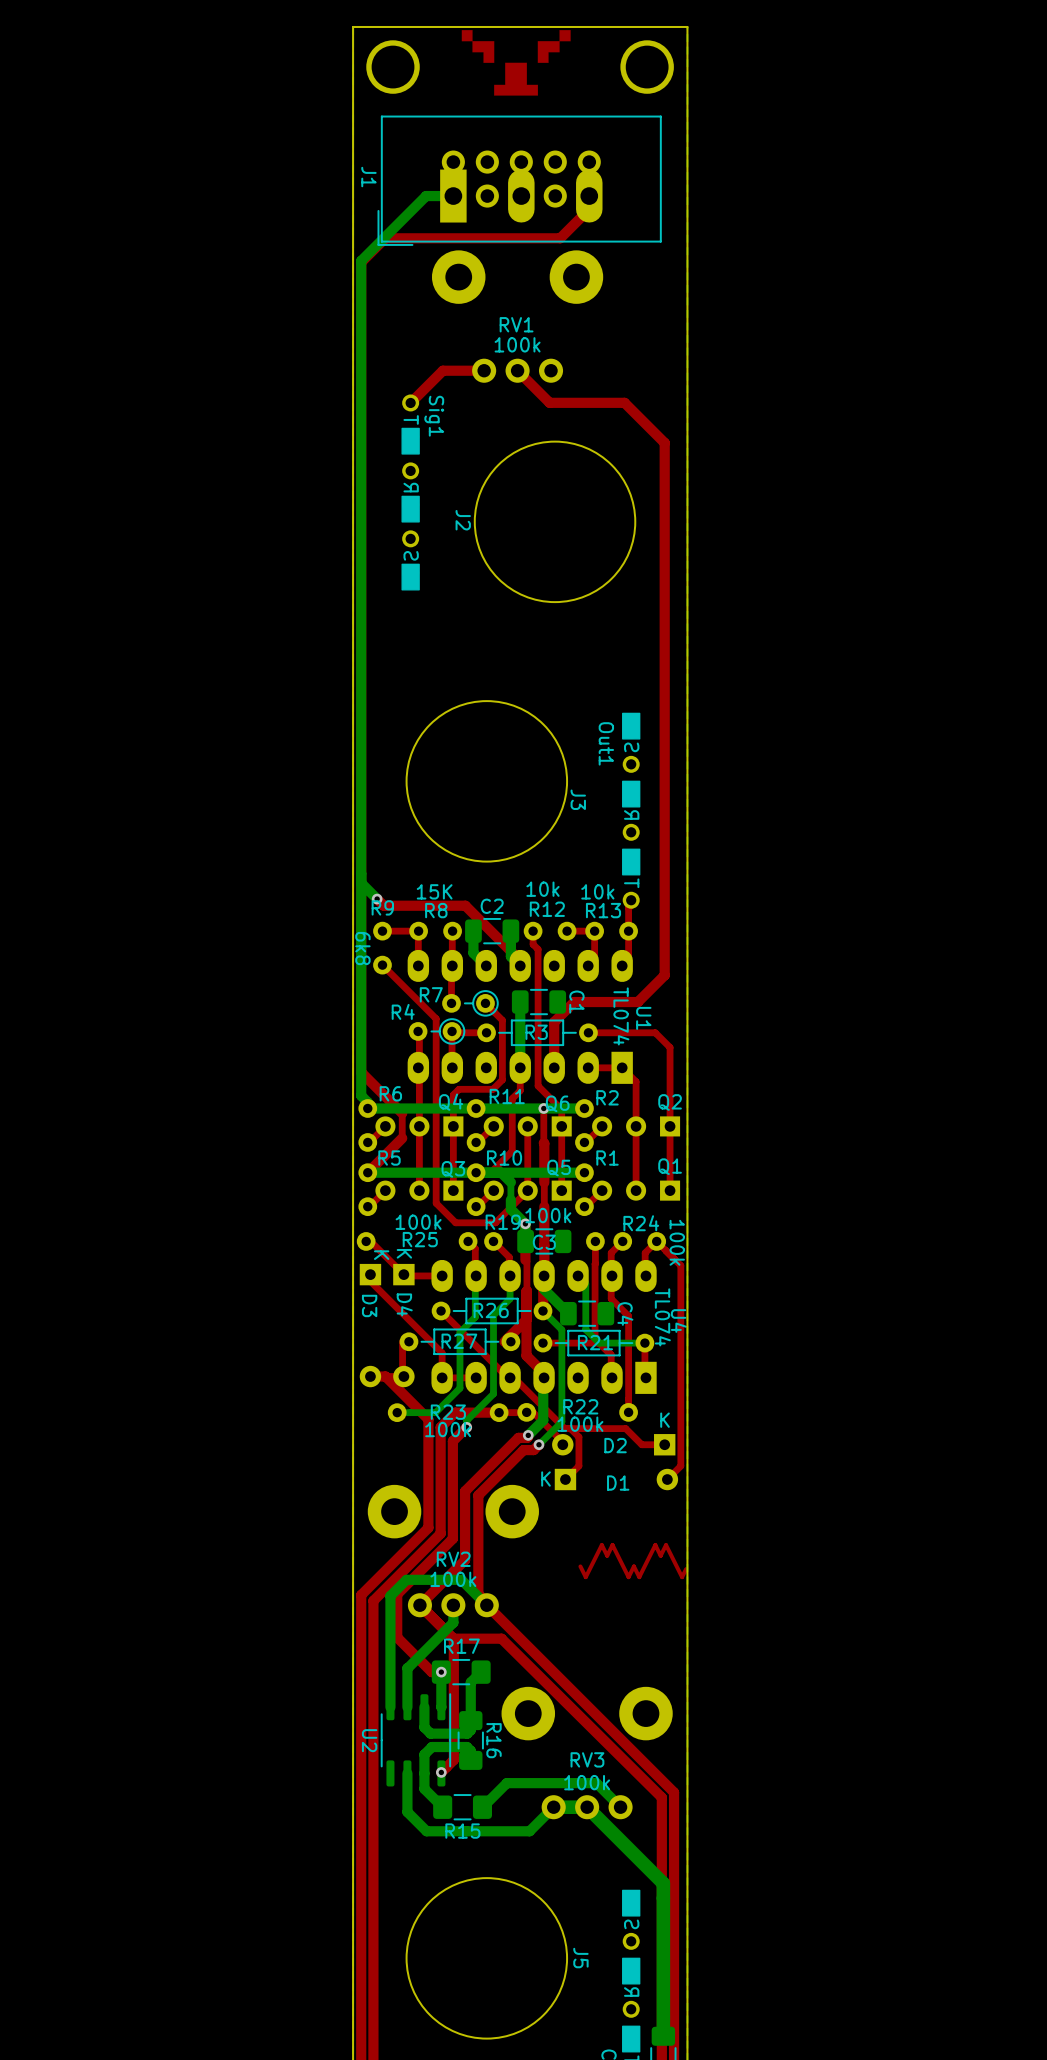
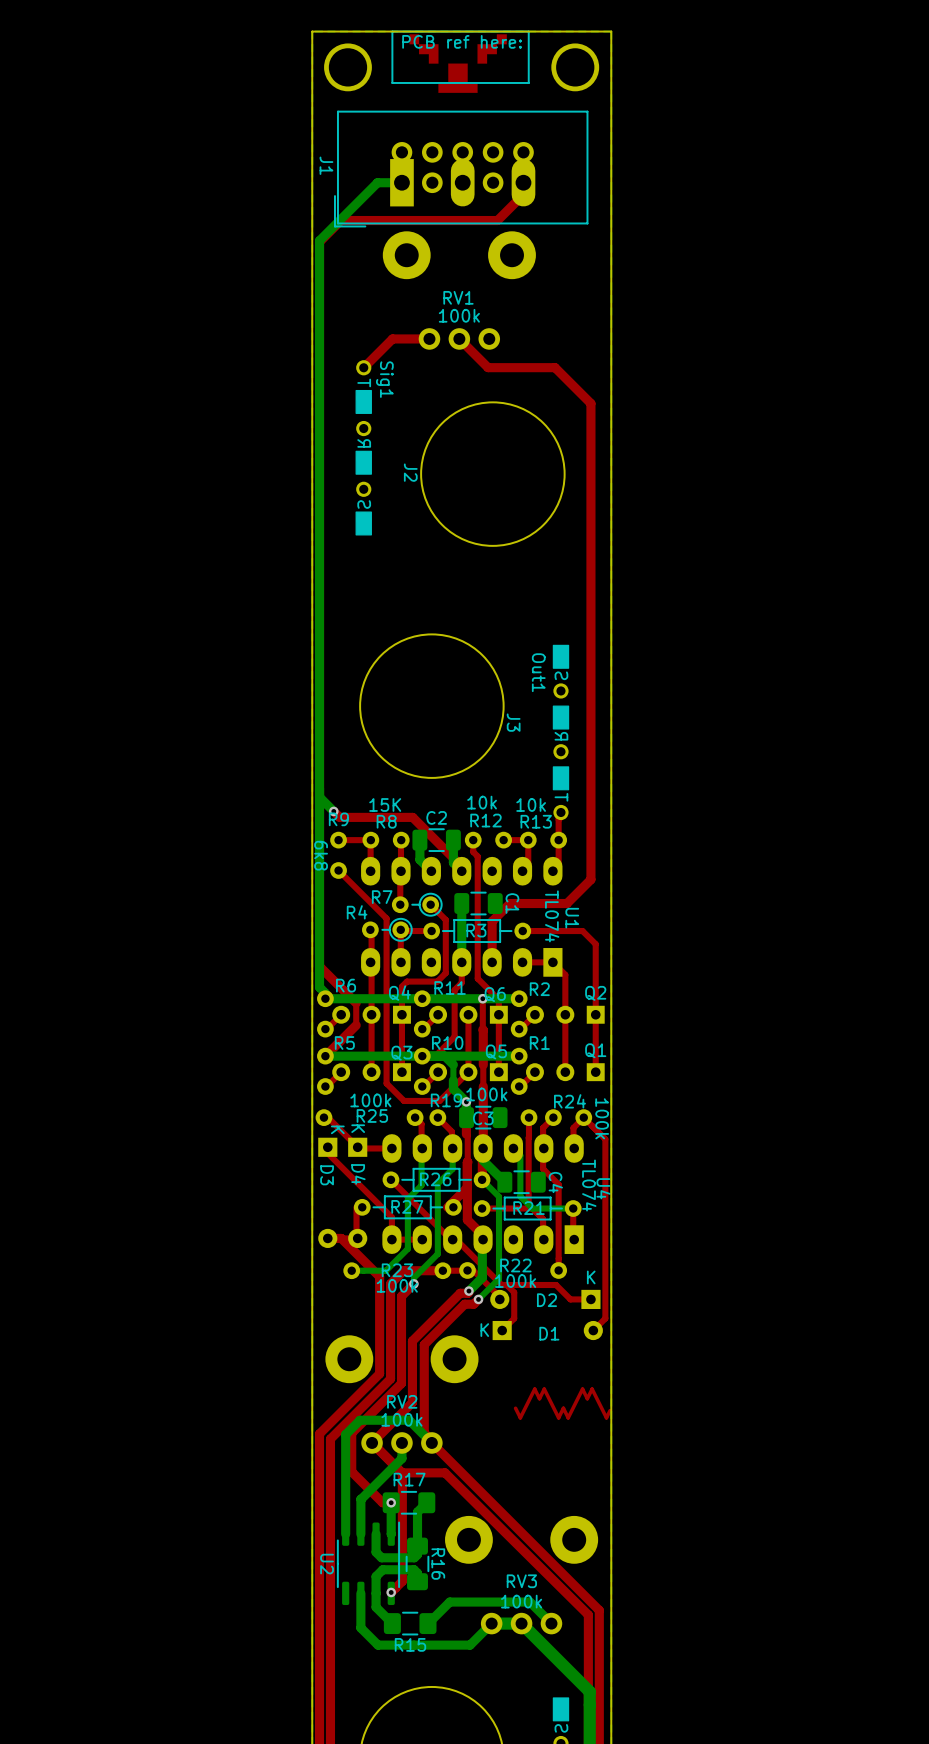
line: none -> (528, 31) (392, 31) (392, 82) (528, 82) (528, 31)
text: none -> PCB ref here: (462, 41)

